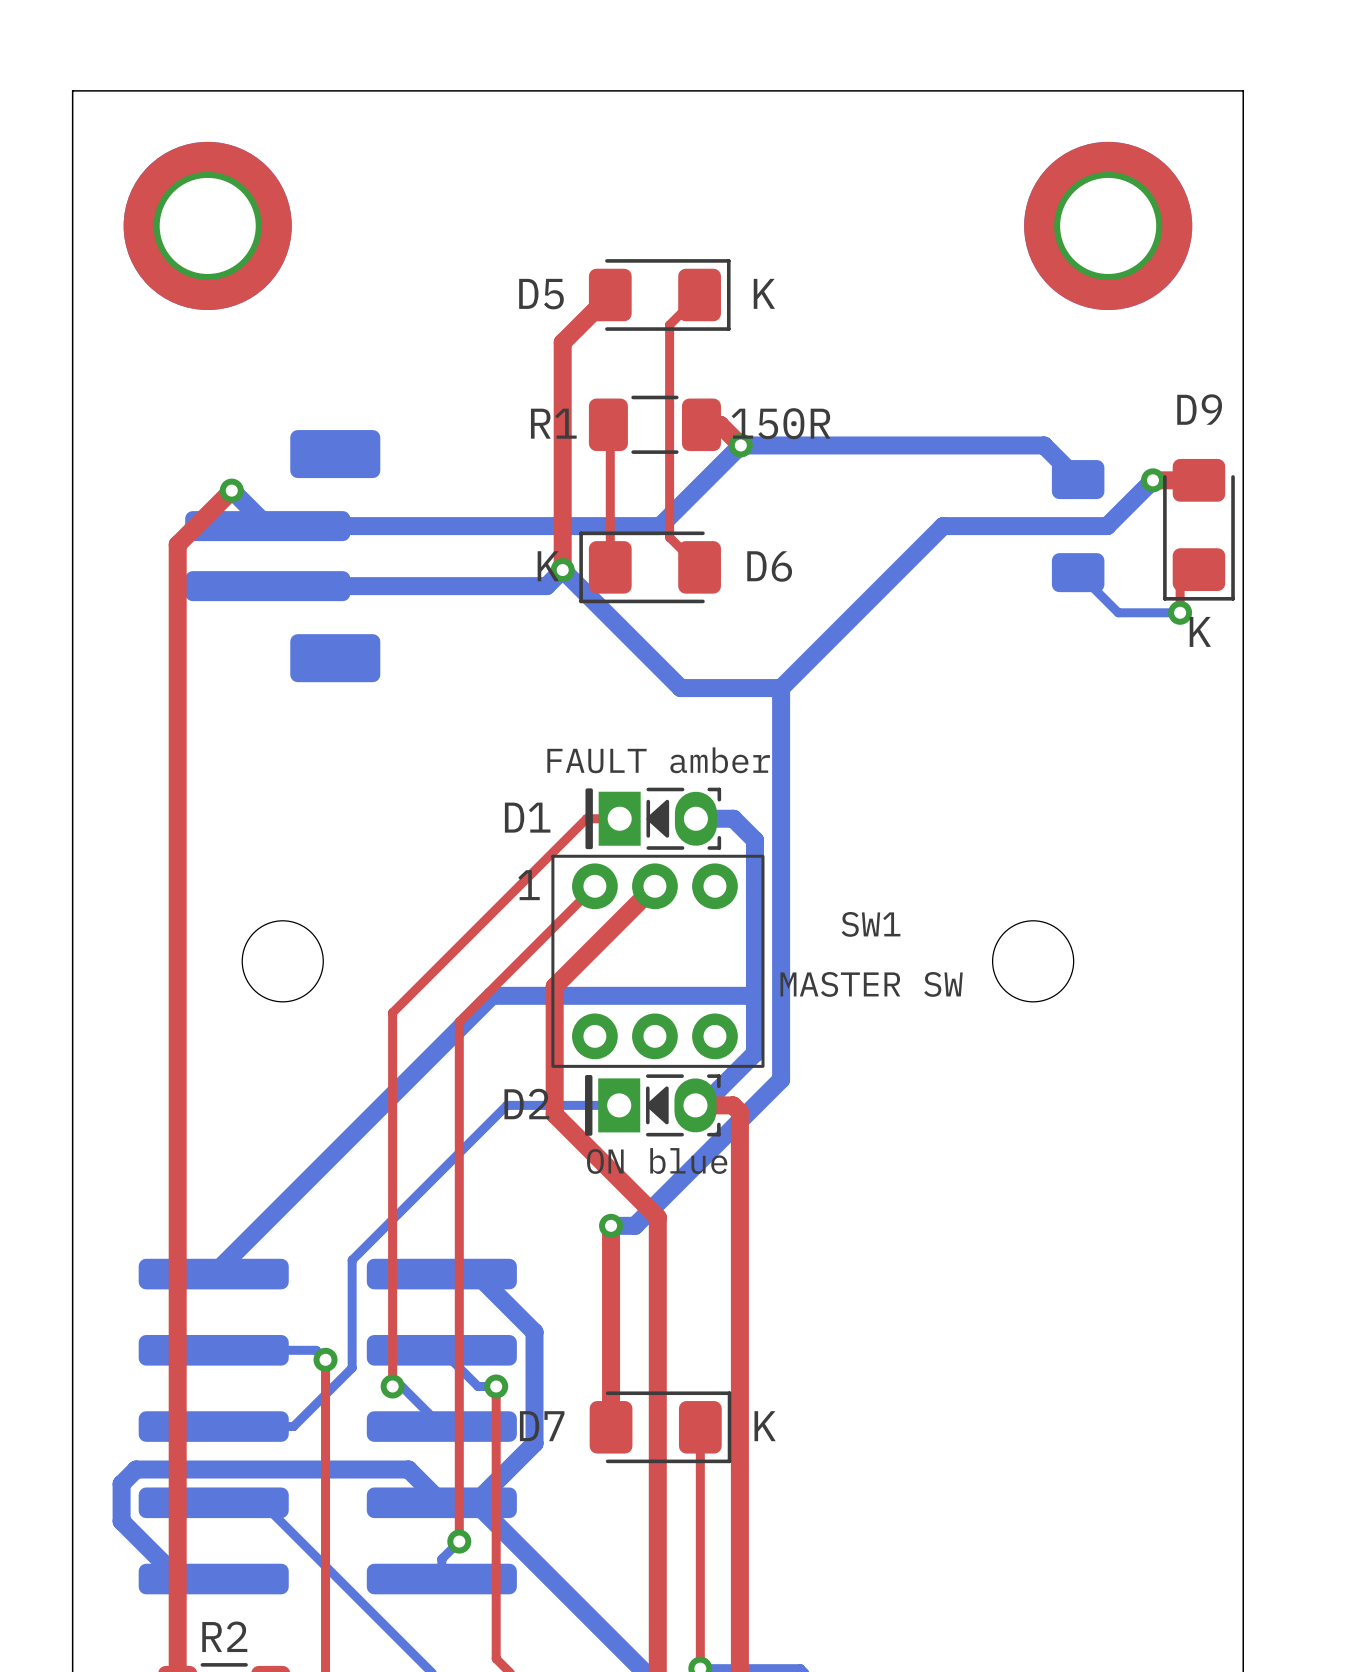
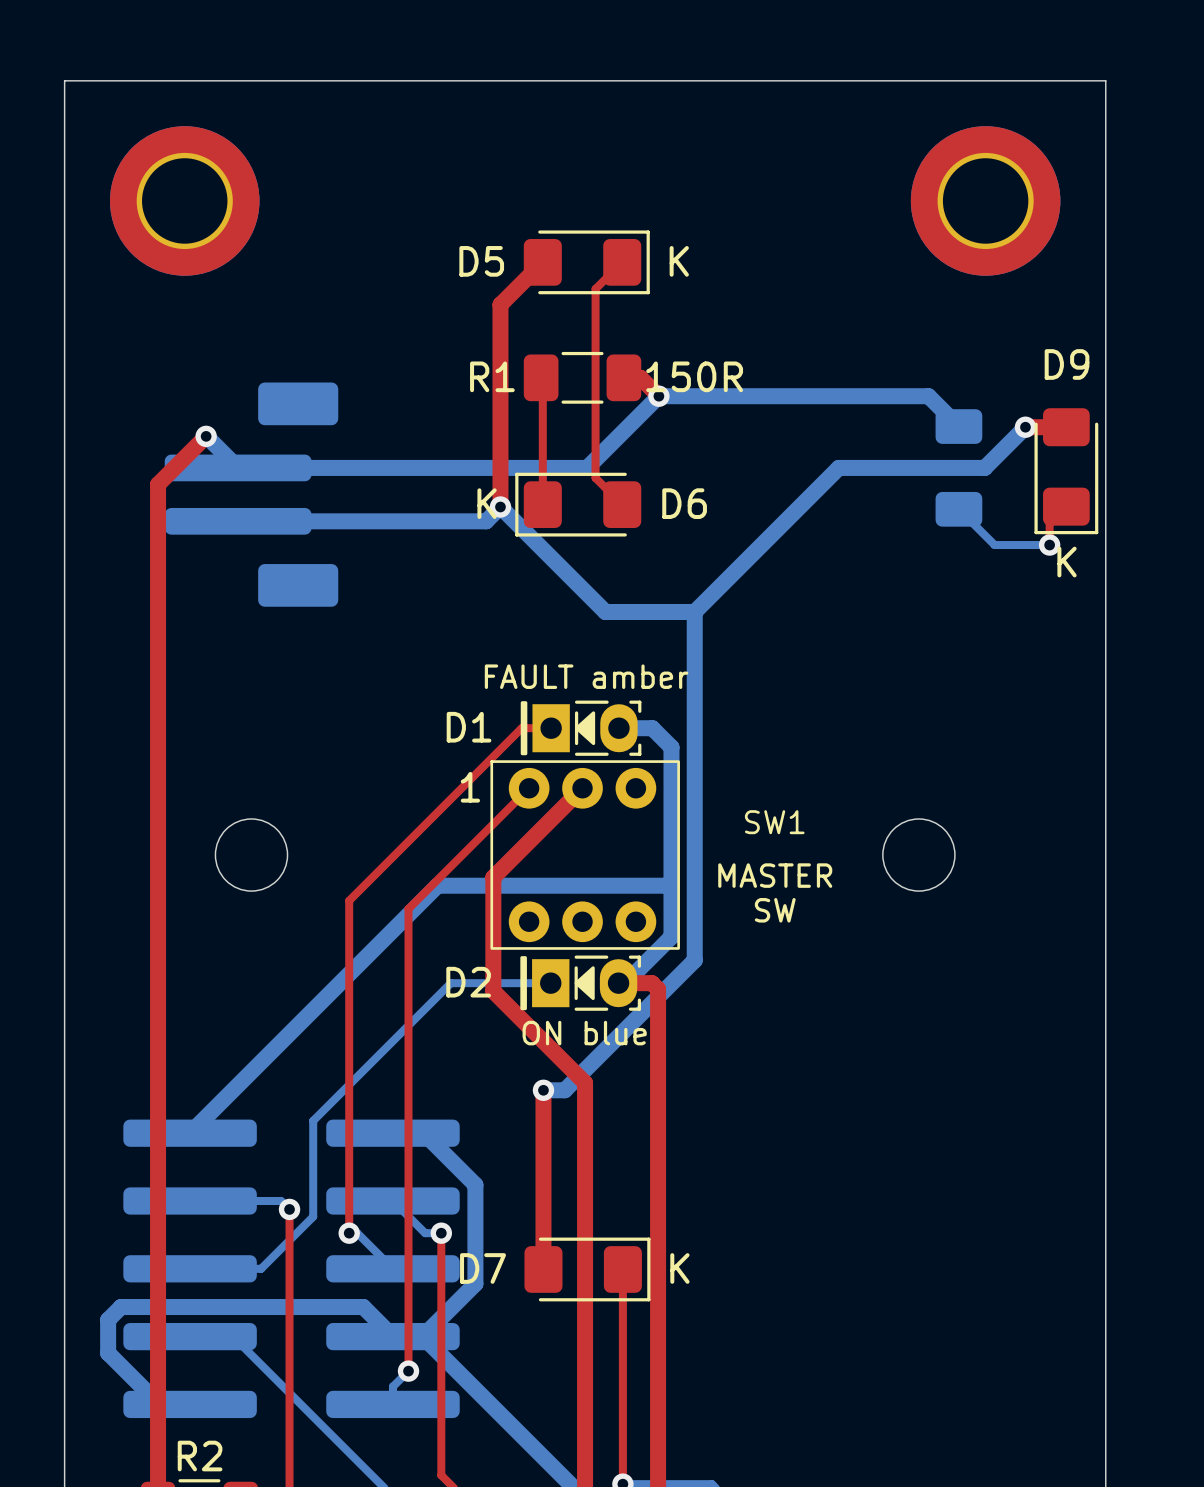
SW1 text: MASTER SW (871, 984) -> MASTER (775, 875)
SW1 text: none -> SW (775, 910)

